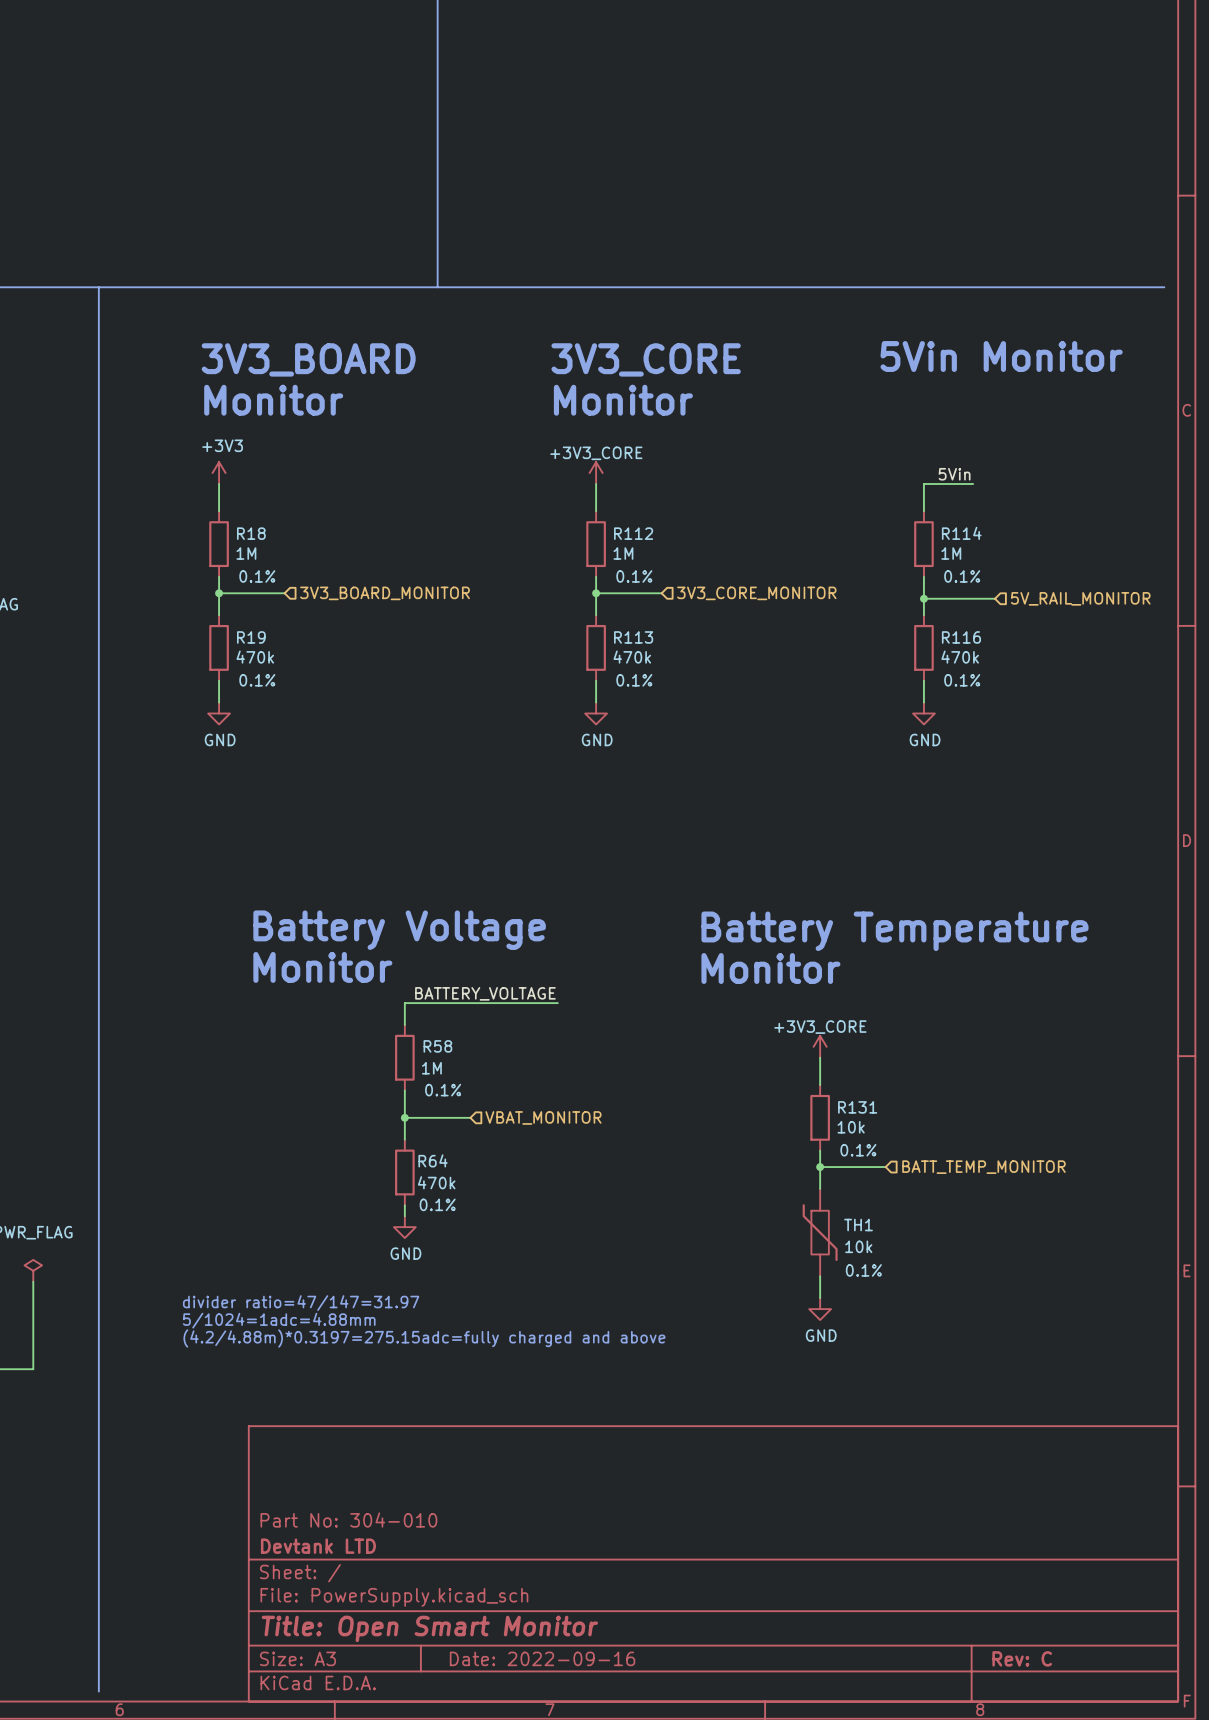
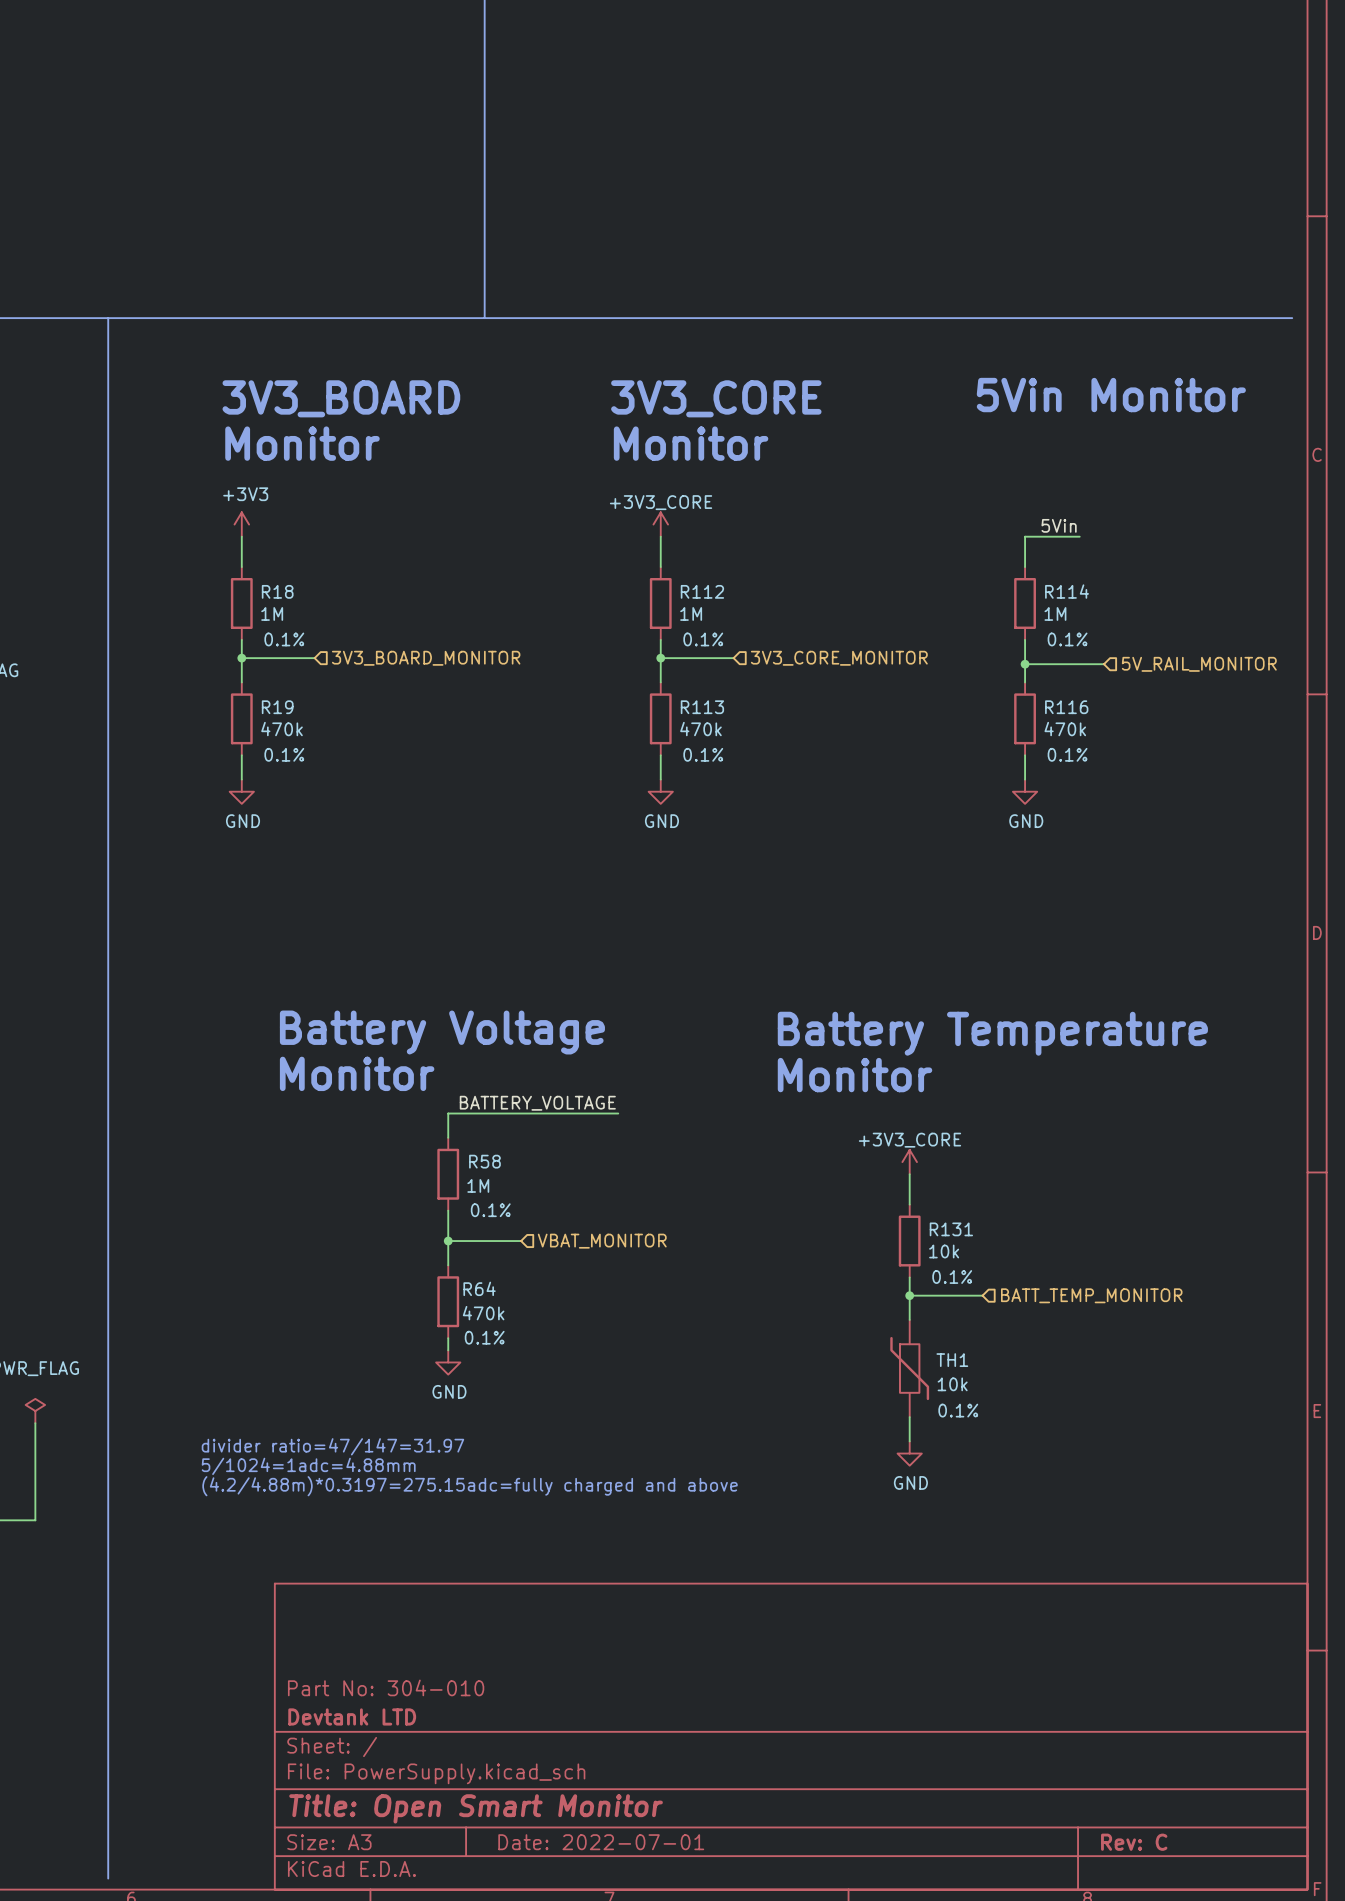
title block: Date: 2022-09-16 (542, 1658) -> Date: 2022-07-01 (601, 1842)

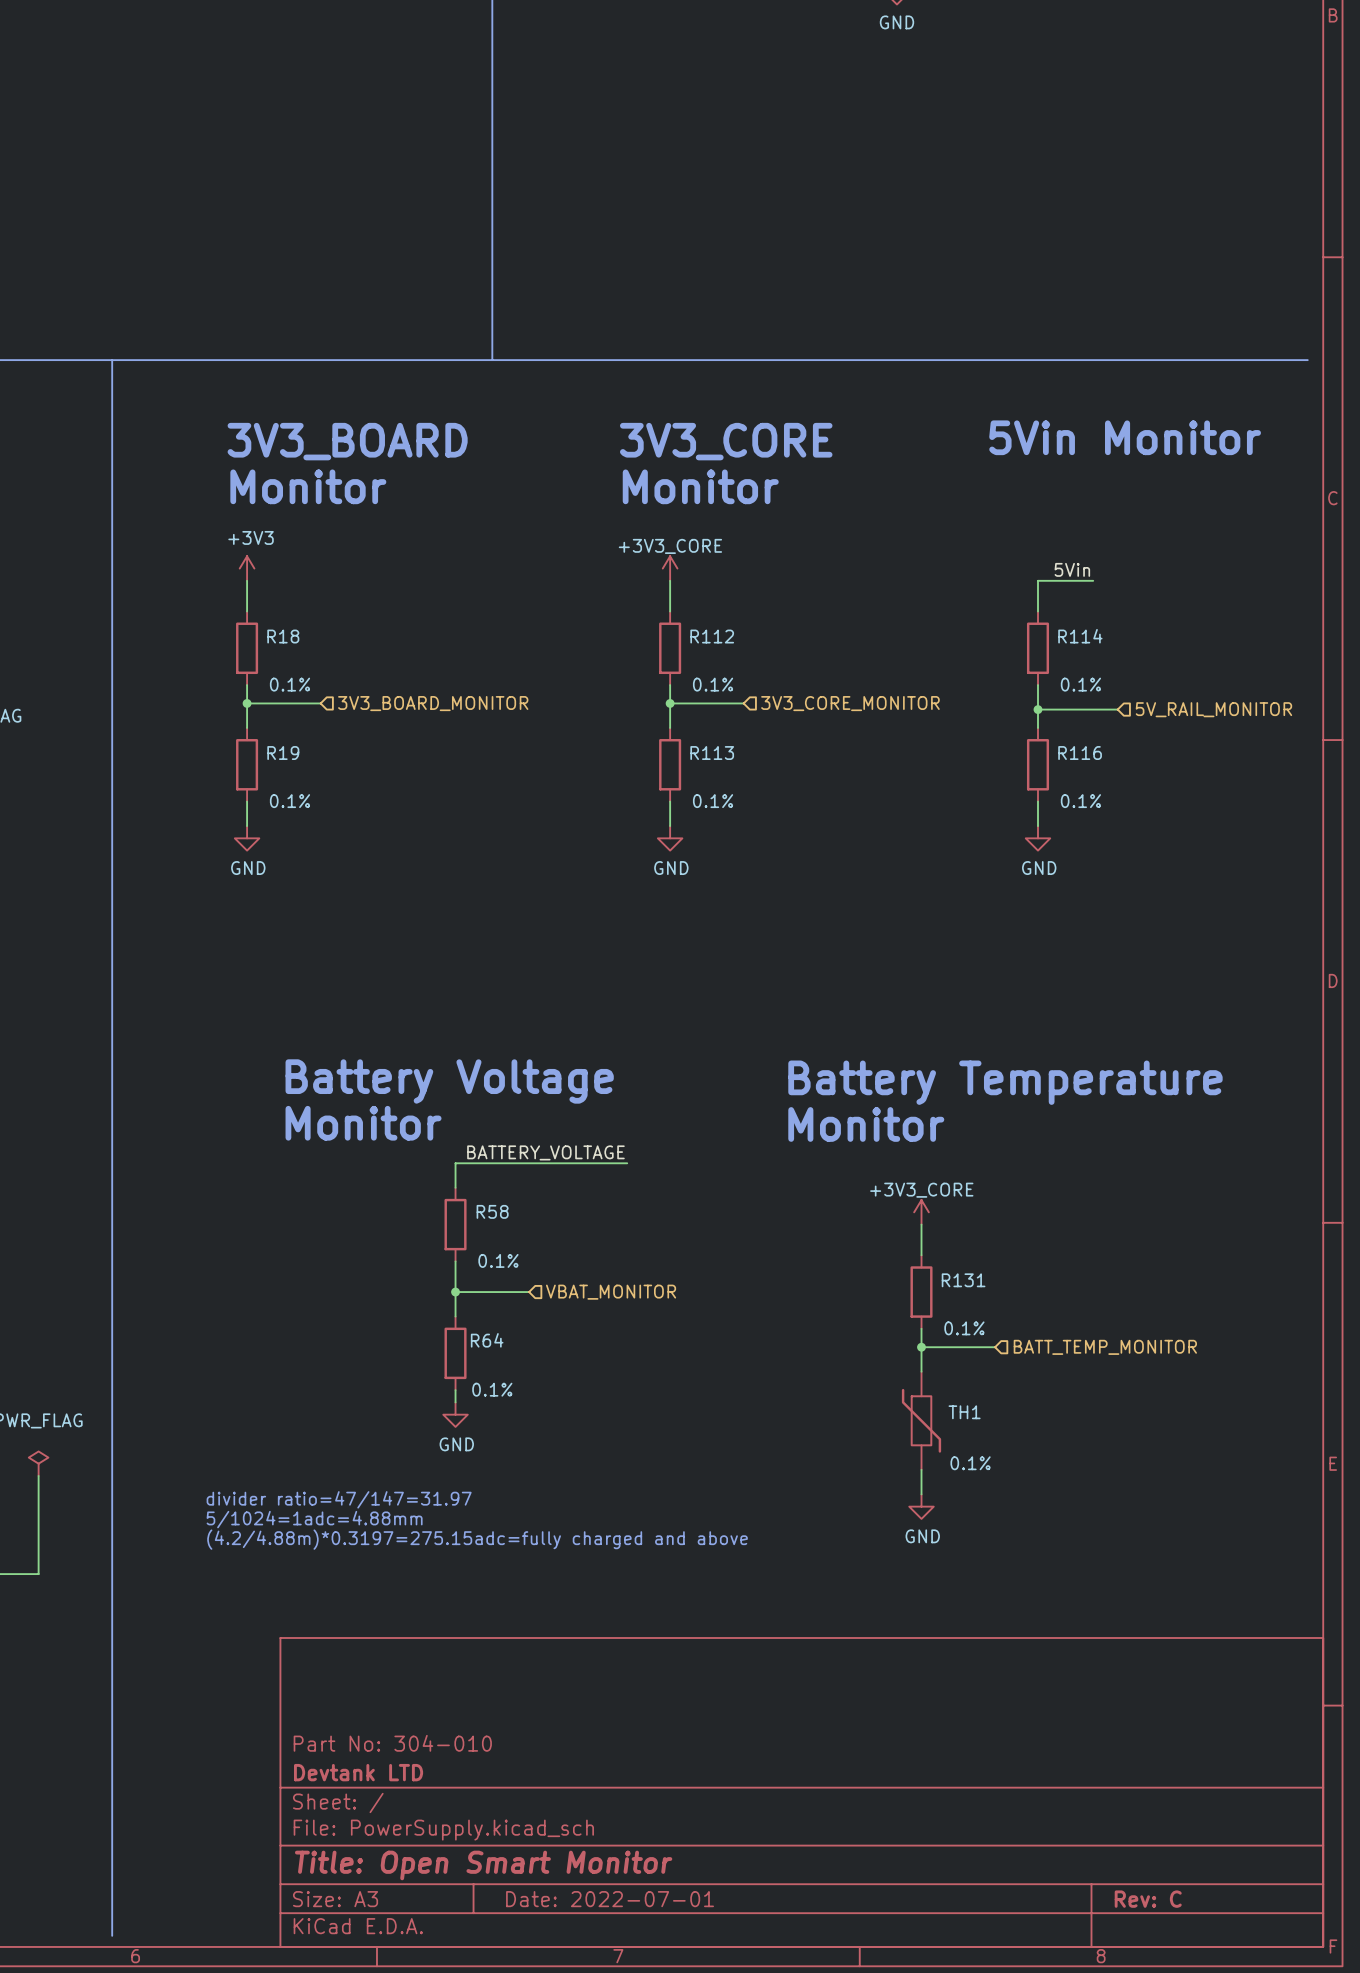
R18 value: 1M (272, 613) -> none
R112 value: 1M (691, 613) -> none
R114 value: 1M (1055, 613) -> none
R19 value: 470k (282, 729) -> none
R113 value: 470k (700, 729) -> none
R116 value: 470k (1065, 729) -> none
R58 value: 1M (478, 1185) -> none
R131 value: 10k (944, 1251) -> none
R64 value: 470k (483, 1313) -> none
TH1 value: 10k (952, 1384) -> none

